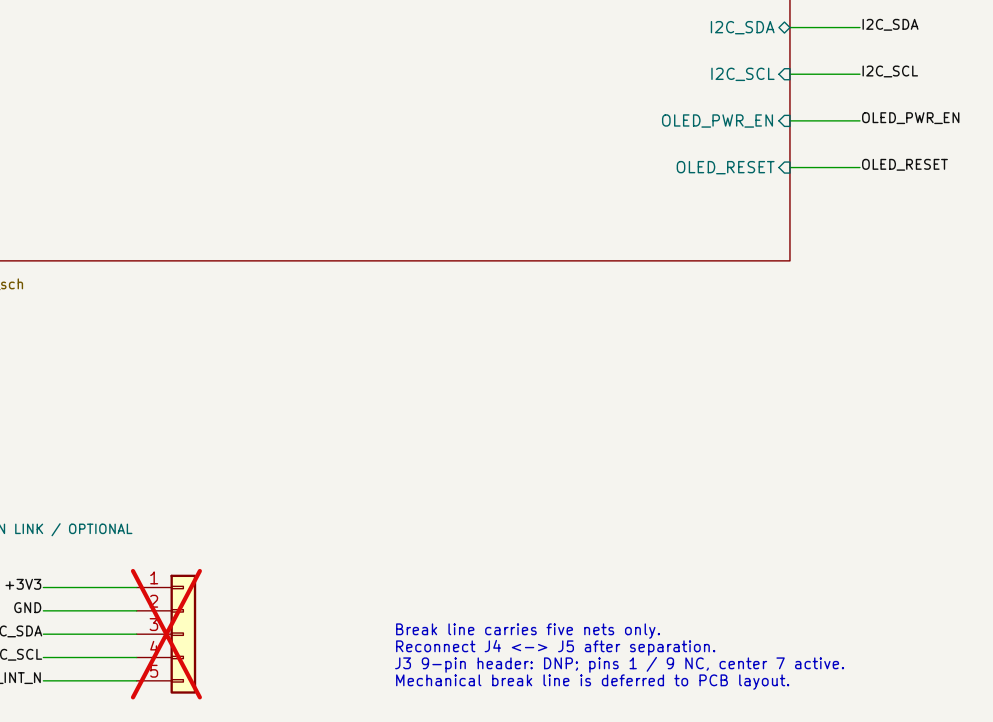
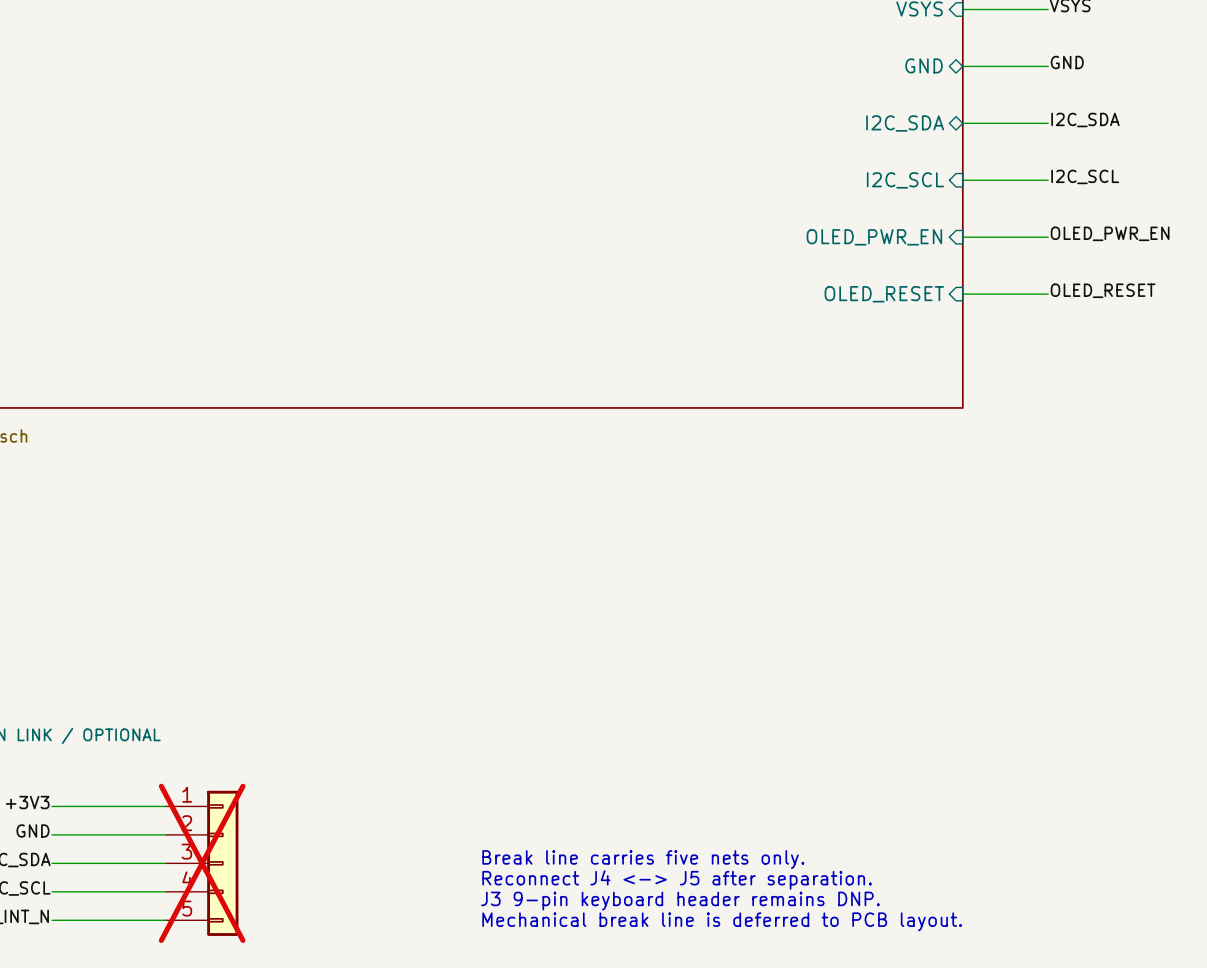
text: J3 9-pin header: DNP; pins 1 / 9 NC, center 7 active. (619, 664) -> J3 9-pin keyboard header remains DNP. (680, 901)

